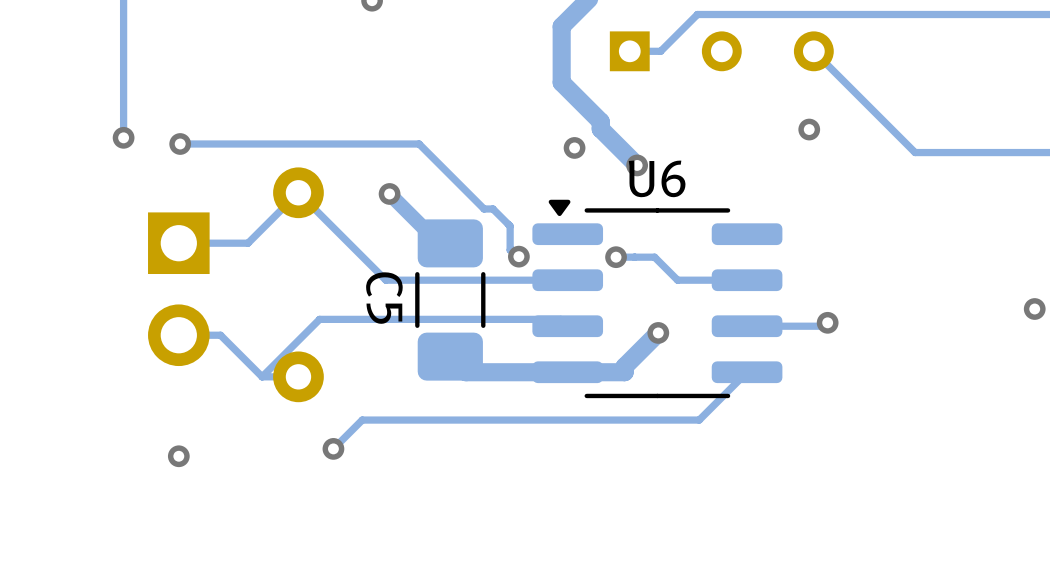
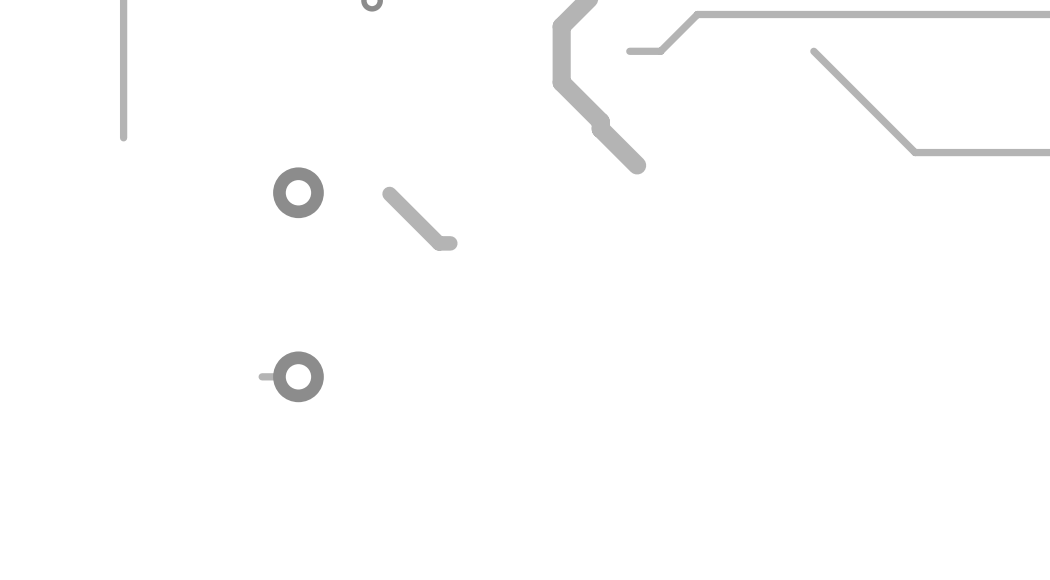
part: (721, 51) -> none
via: (809, 129) -> none
via: (123, 137) -> none
track: (180, 143) (419, 143) (484, 208) (492, 208) (510, 226) (510, 250) (518, 256) -> none
via: (180, 143) -> none
via: (574, 147) -> none
via: (637, 165) -> none
via: (389, 193) -> none
track: (178, 243) (248, 243) (298, 192) (385, 280) (567, 280) -> none
via: (518, 256) -> none
track: (616, 257) (654, 257) (677, 280) (747, 280) -> none
via: (616, 257) -> none
part: (178, 289) -> none
U6: (657, 298) -> none
C5: (450, 300) -> none
via: (1034, 309) -> none
track: (827, 322) (824, 326) (747, 326) -> none
via: (827, 322) -> none
track: (567, 326) (560, 319) (319, 319) (262, 376) (220, 335) (178, 335) -> none
track: (658, 332) (624, 366) (624, 372) (465, 372) (450, 356) -> none
via: (658, 332) -> none
track: (747, 372) (699, 420) (362, 420) (333, 448) -> none
via: (333, 448) -> none
via: (178, 456) -> none

